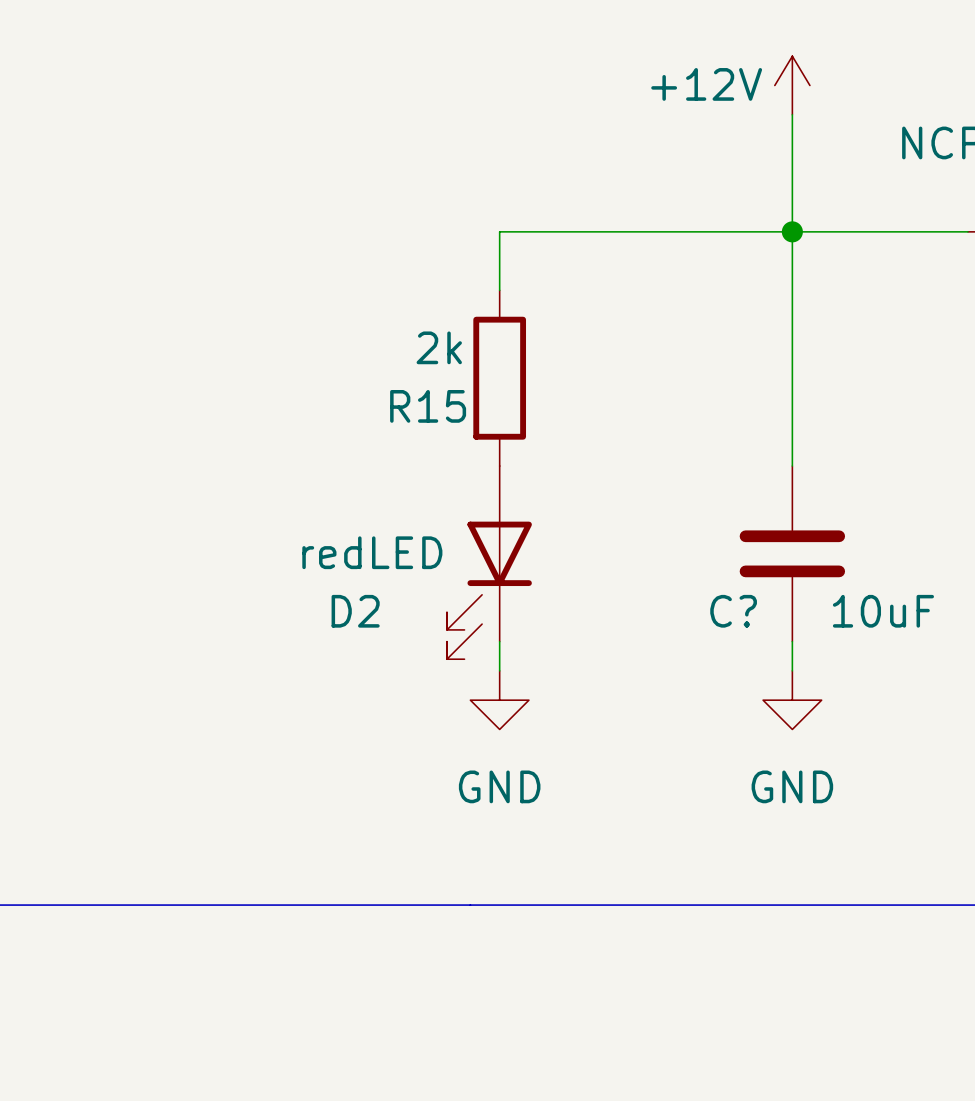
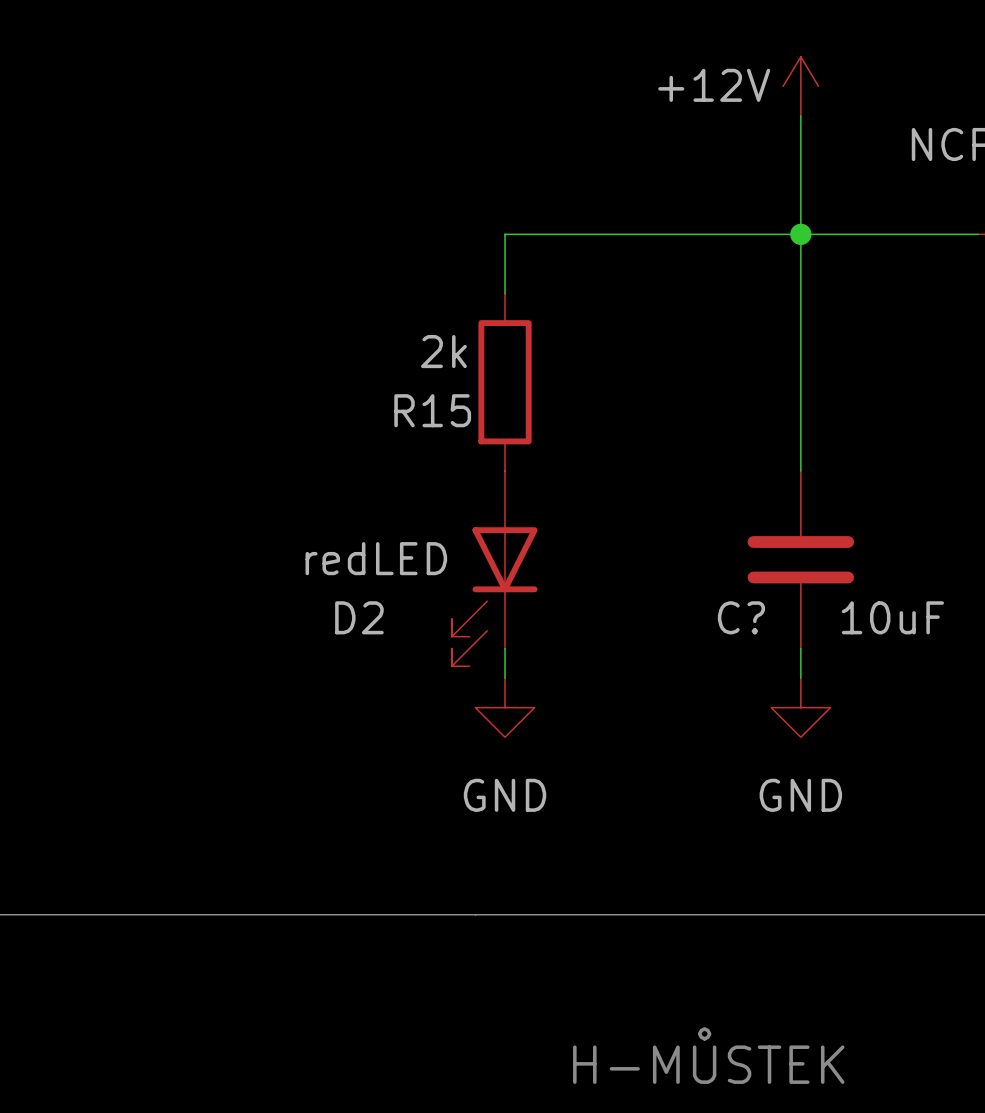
text: none -> H-MŮSTEK (708, 1055)

